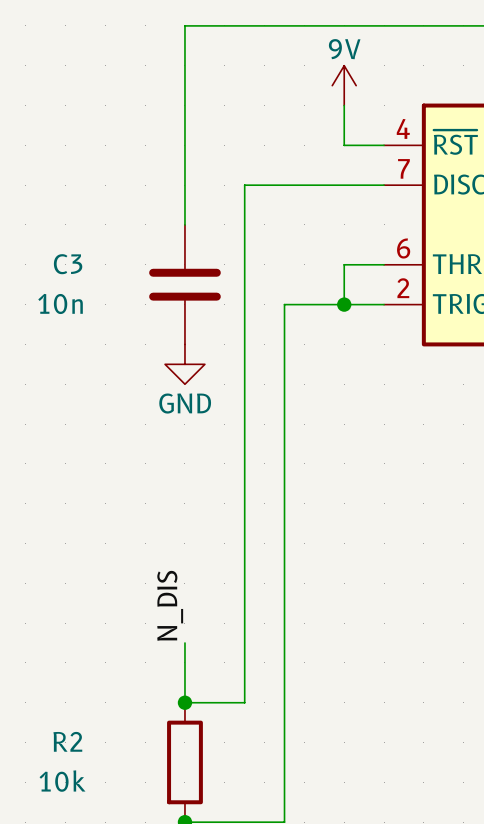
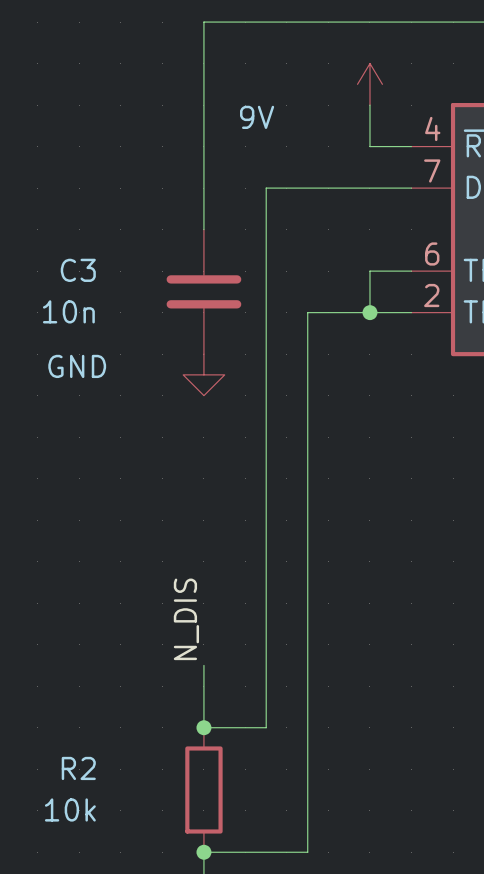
power symbol text position: 9V (344, 49) -> 9V (257, 117)
power symbol text position: GND (185, 403) -> GND (77, 366)

